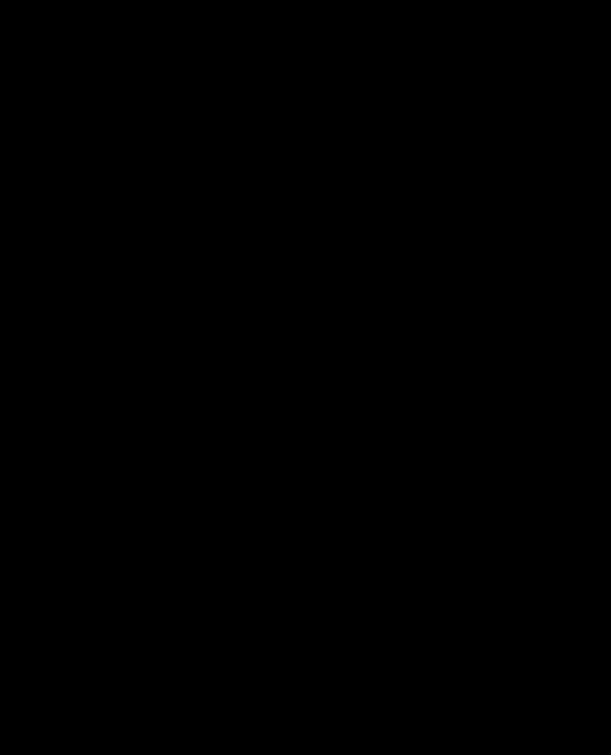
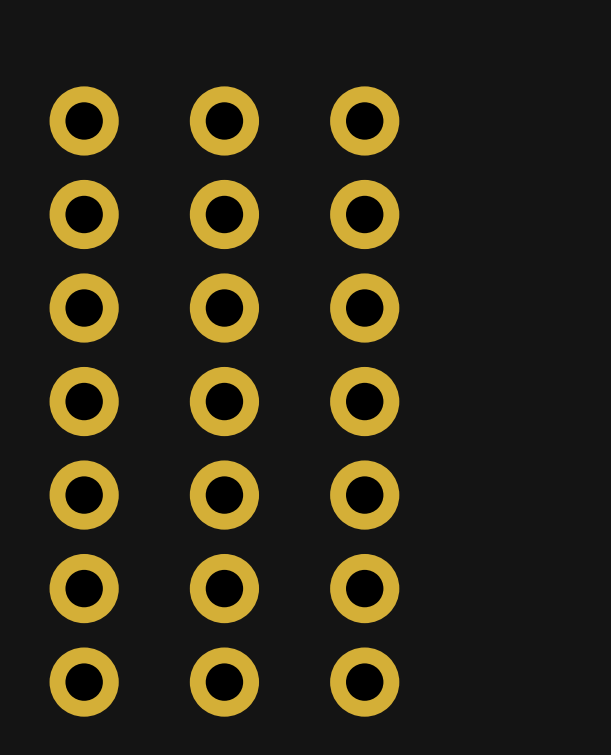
part: none -> (84, 401)
part: none -> (224, 401)
part: none -> (364, 401)

